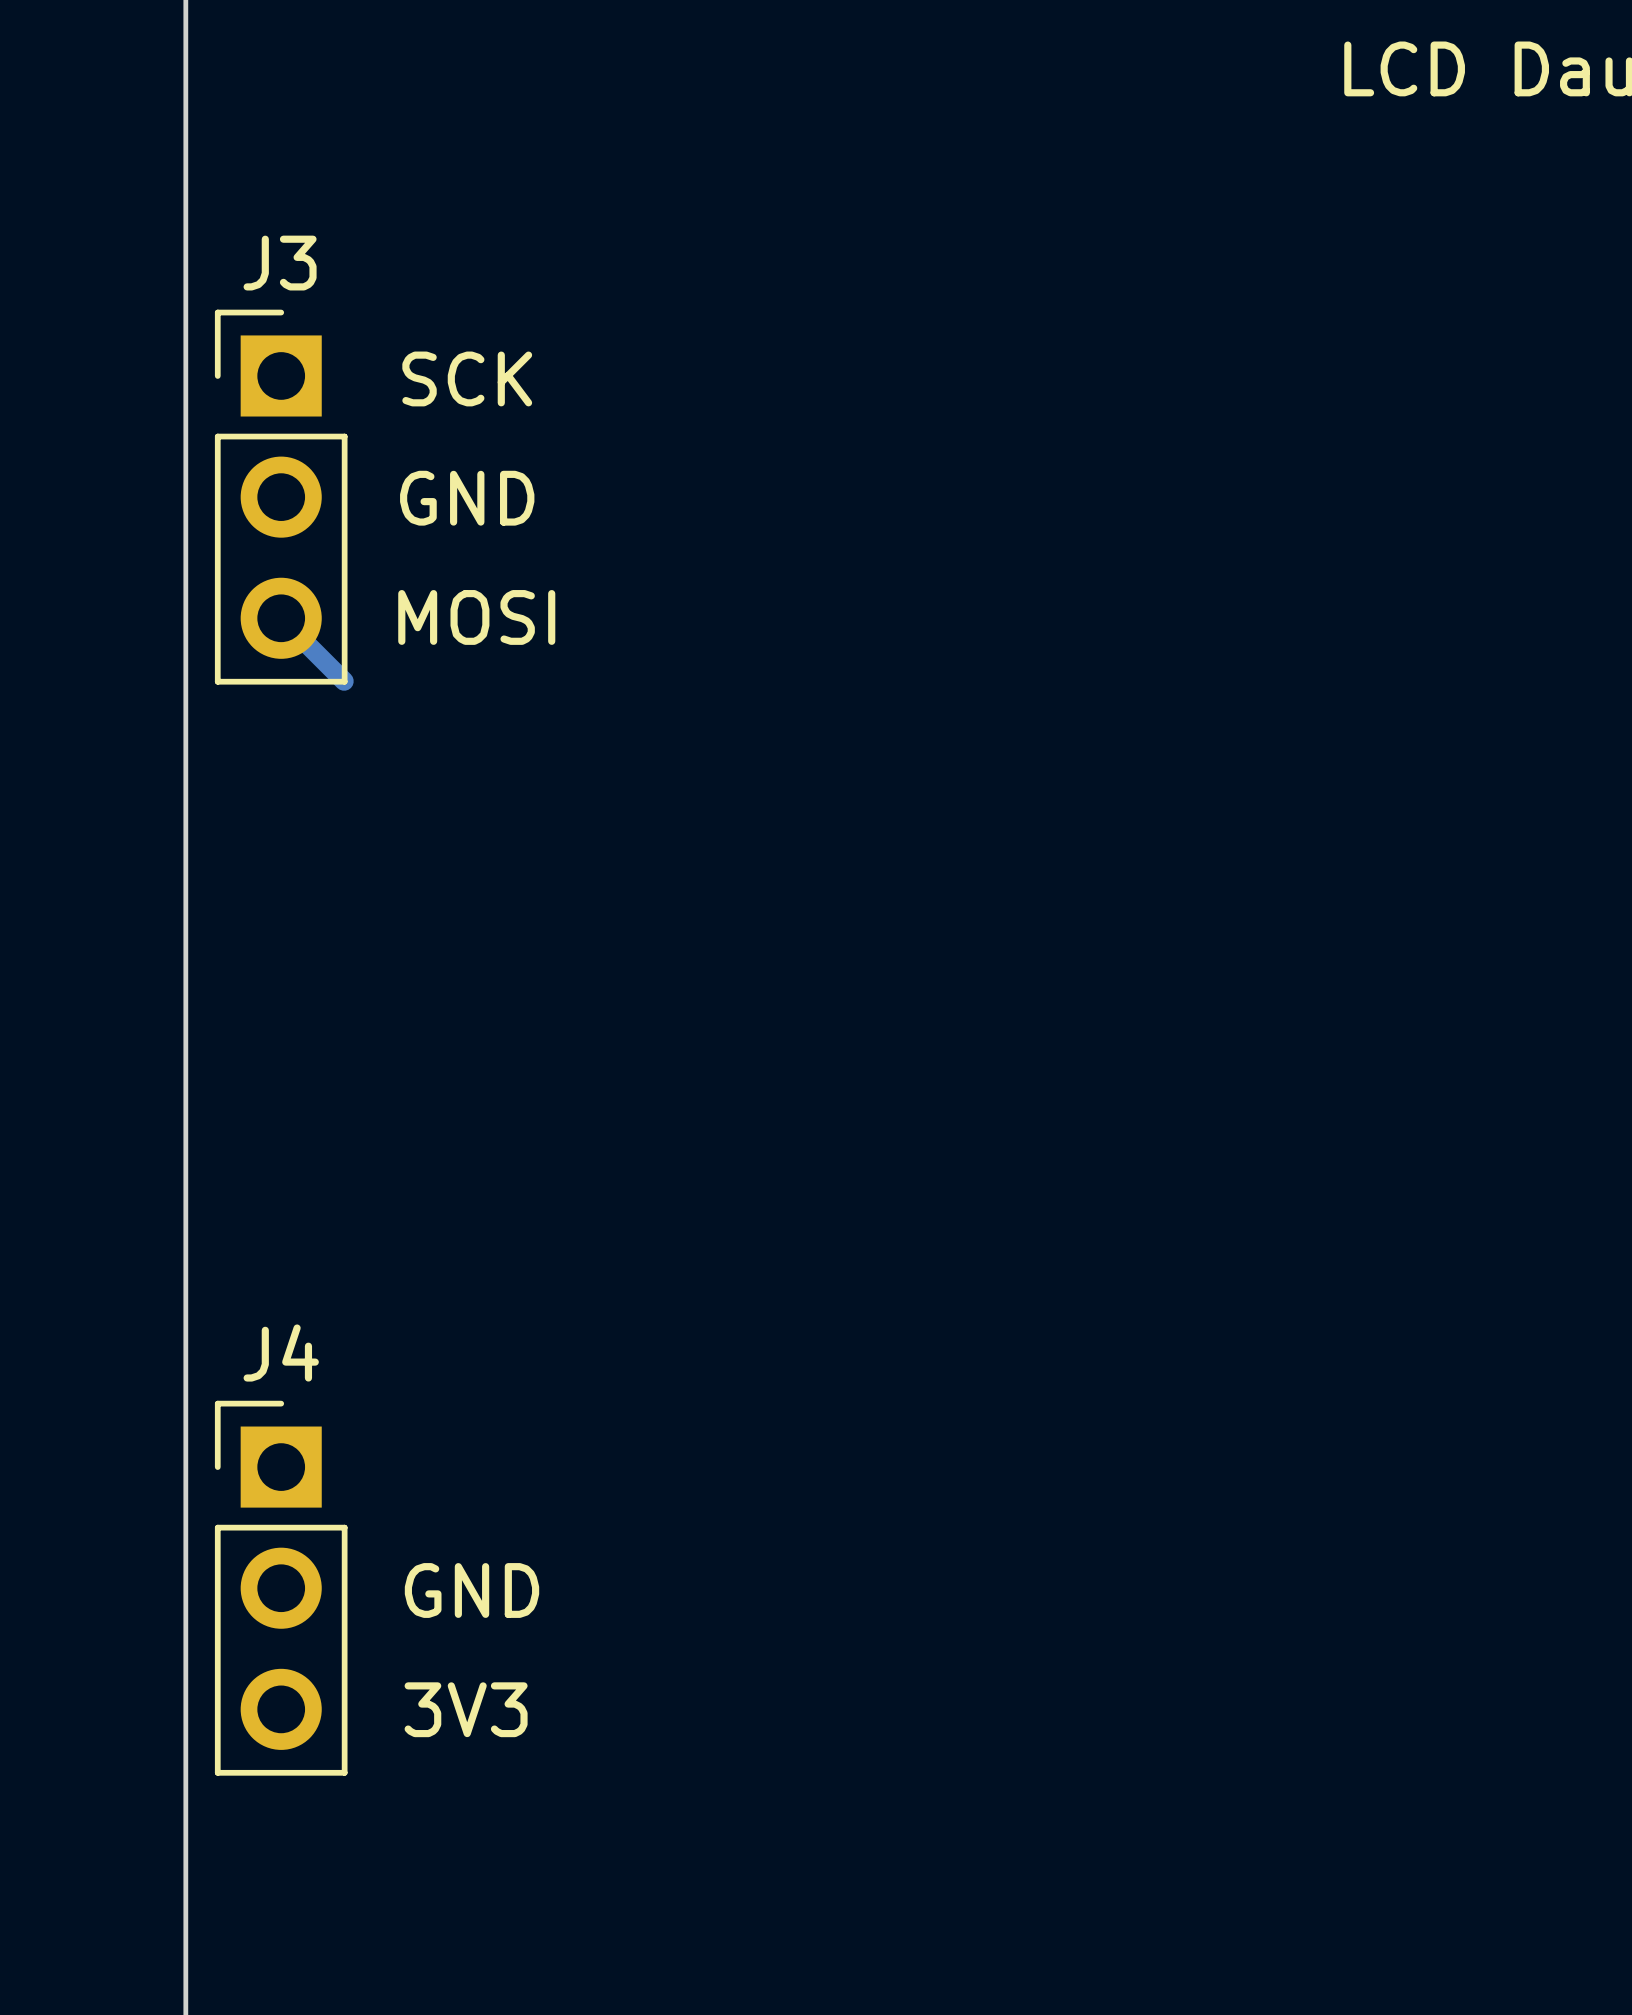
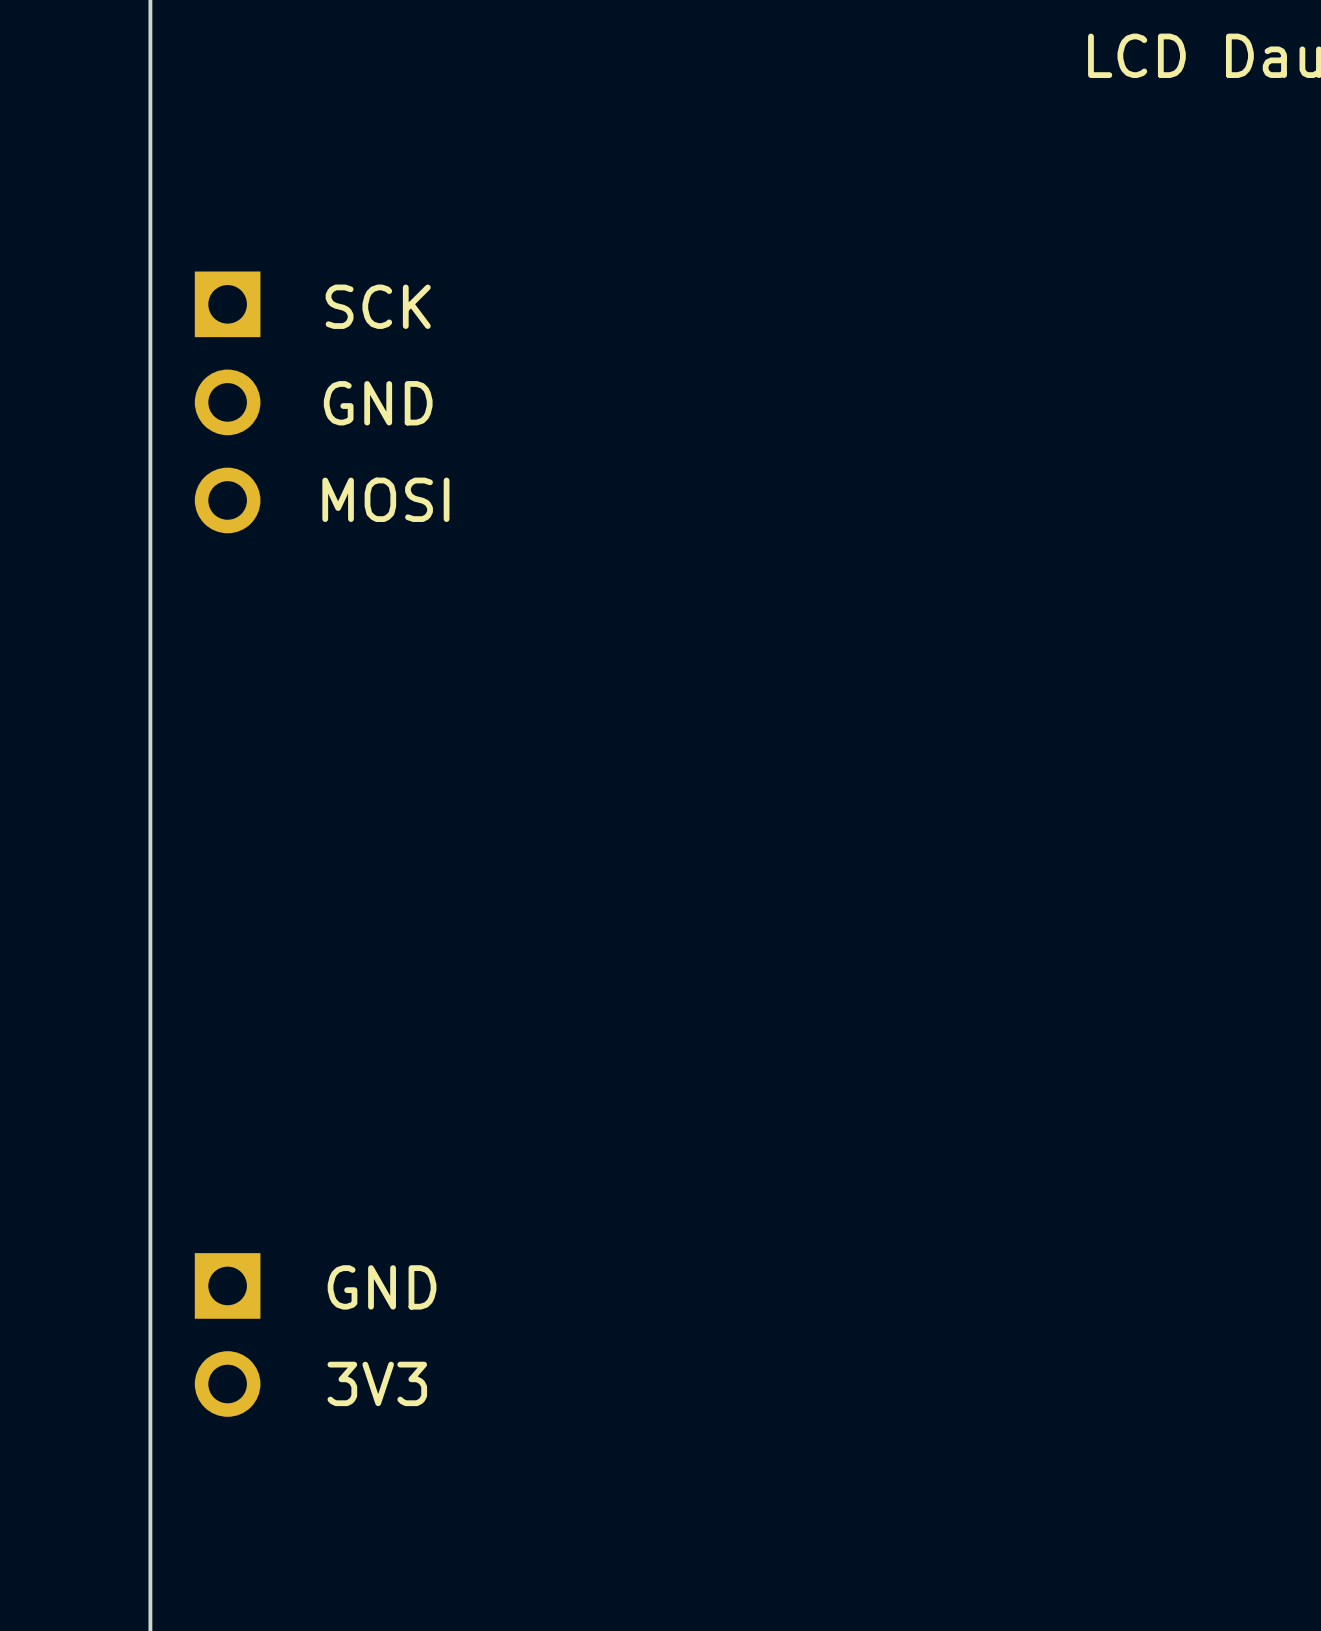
J3: (281, 497) -> none
track: (281, 618) (344, 681) -> none
J4 side: bottom (281, 1588) -> top (227, 402)
part: none -> (227, 1334)

